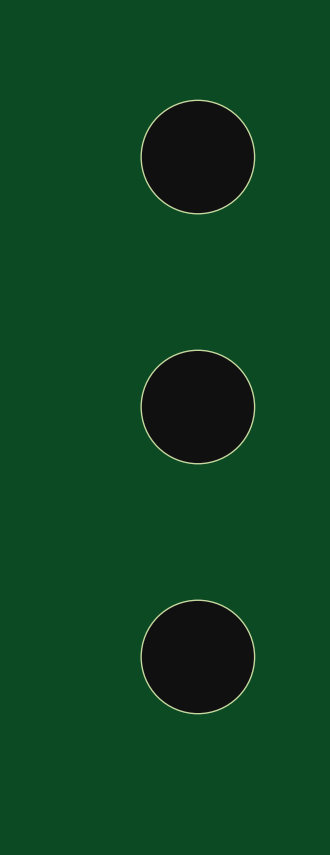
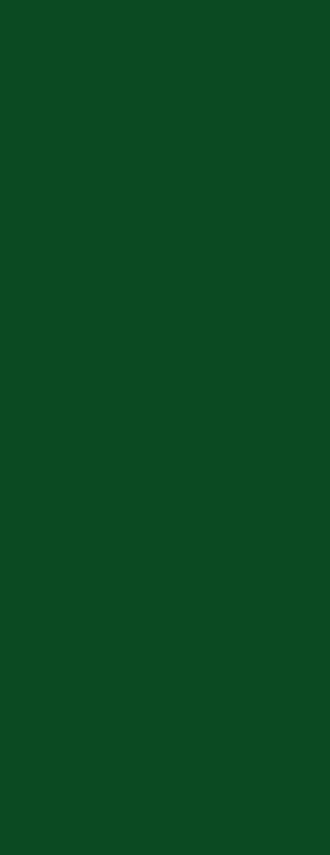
part: (197, 157) -> none
part: (197, 407) -> none
part: (197, 656) -> none

